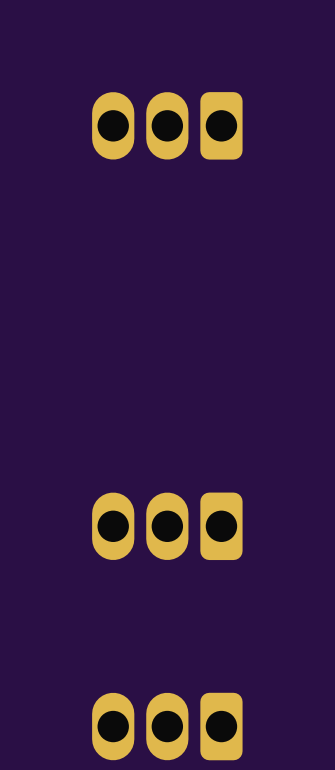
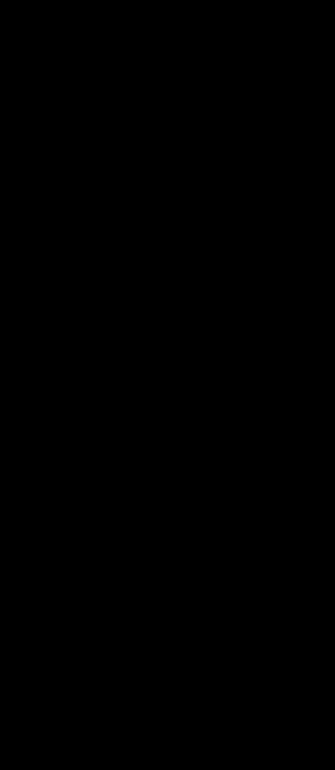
part: (167, 125) -> none
part: (167, 526) -> none
part: (167, 726) -> none

